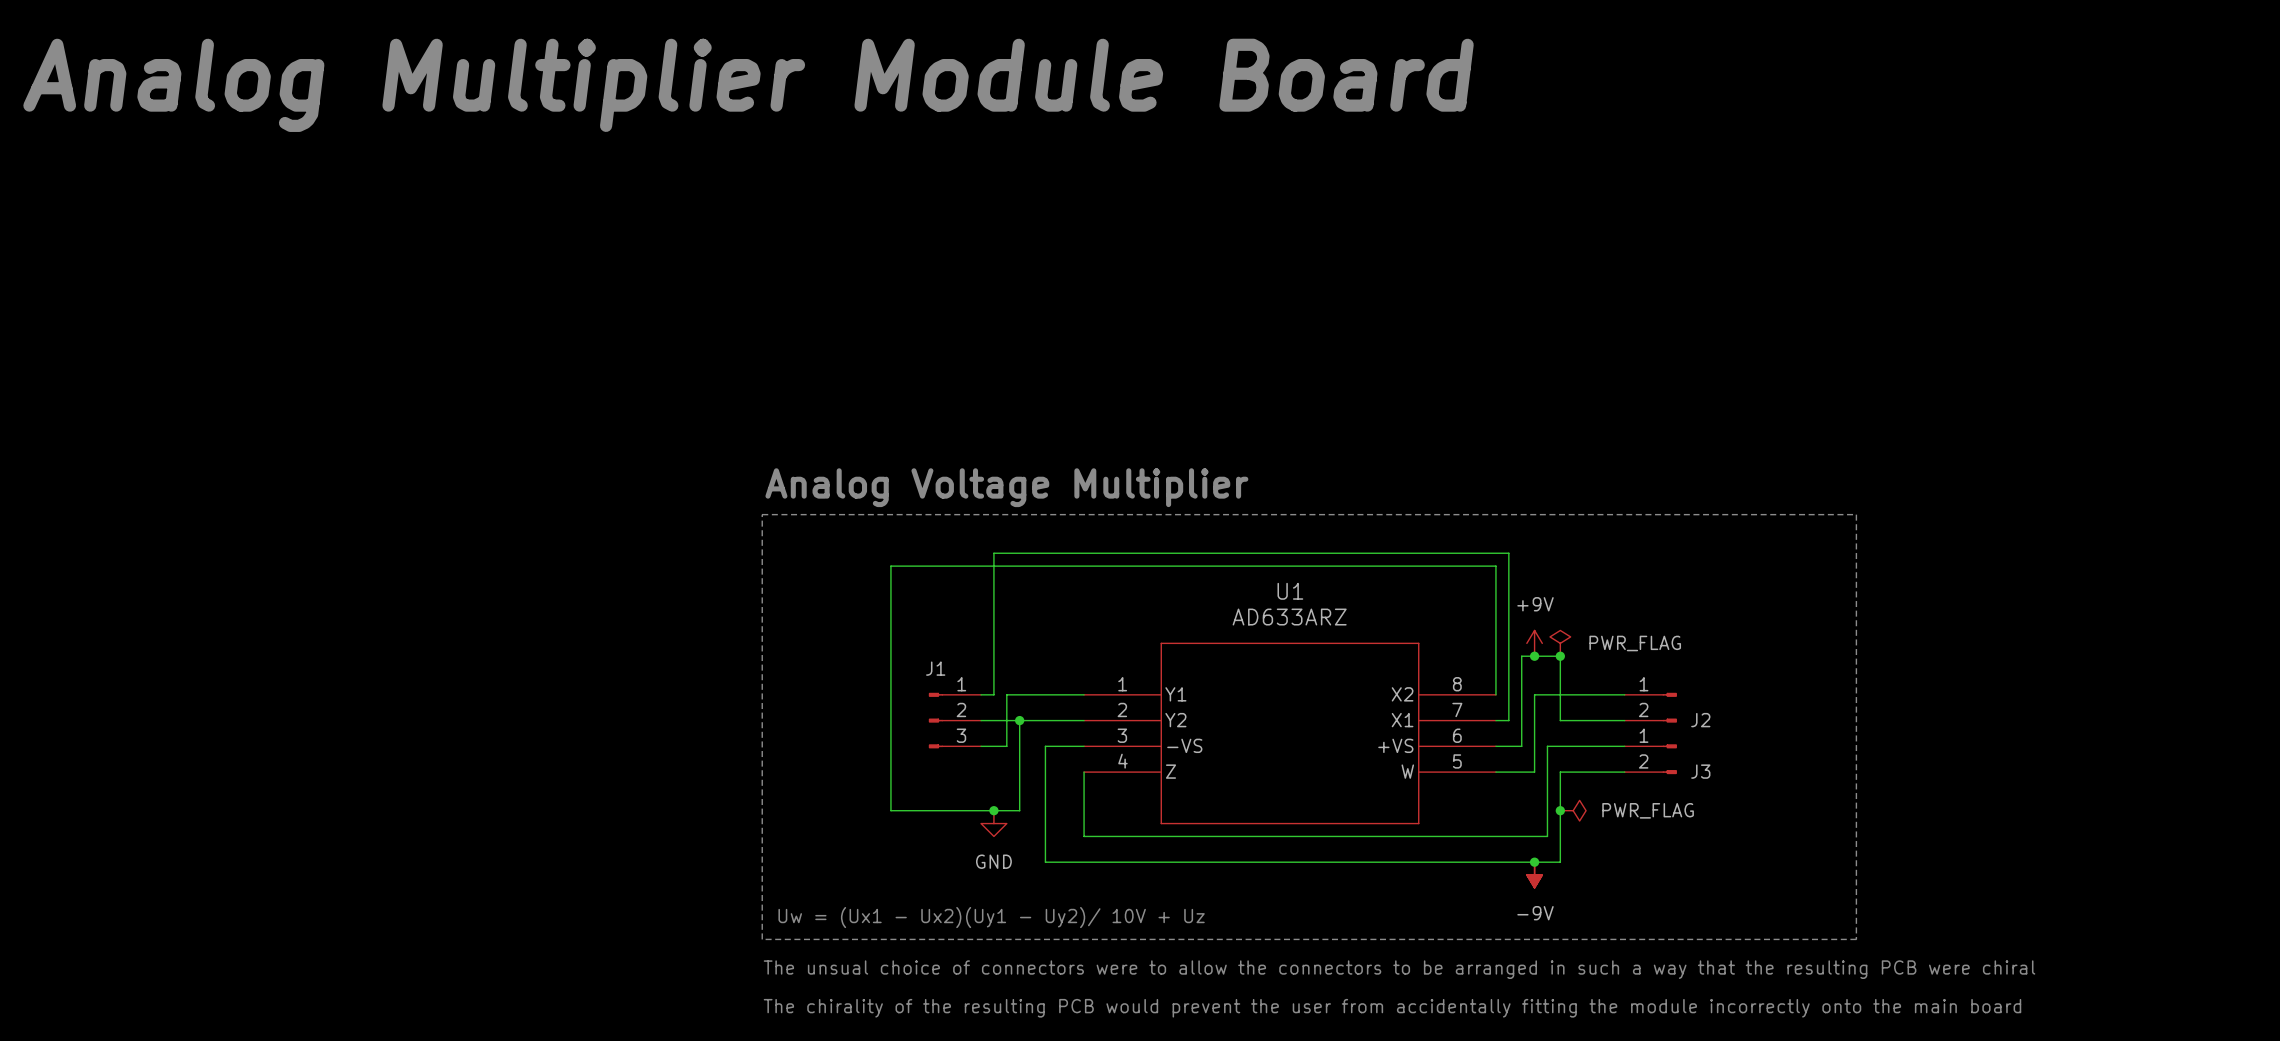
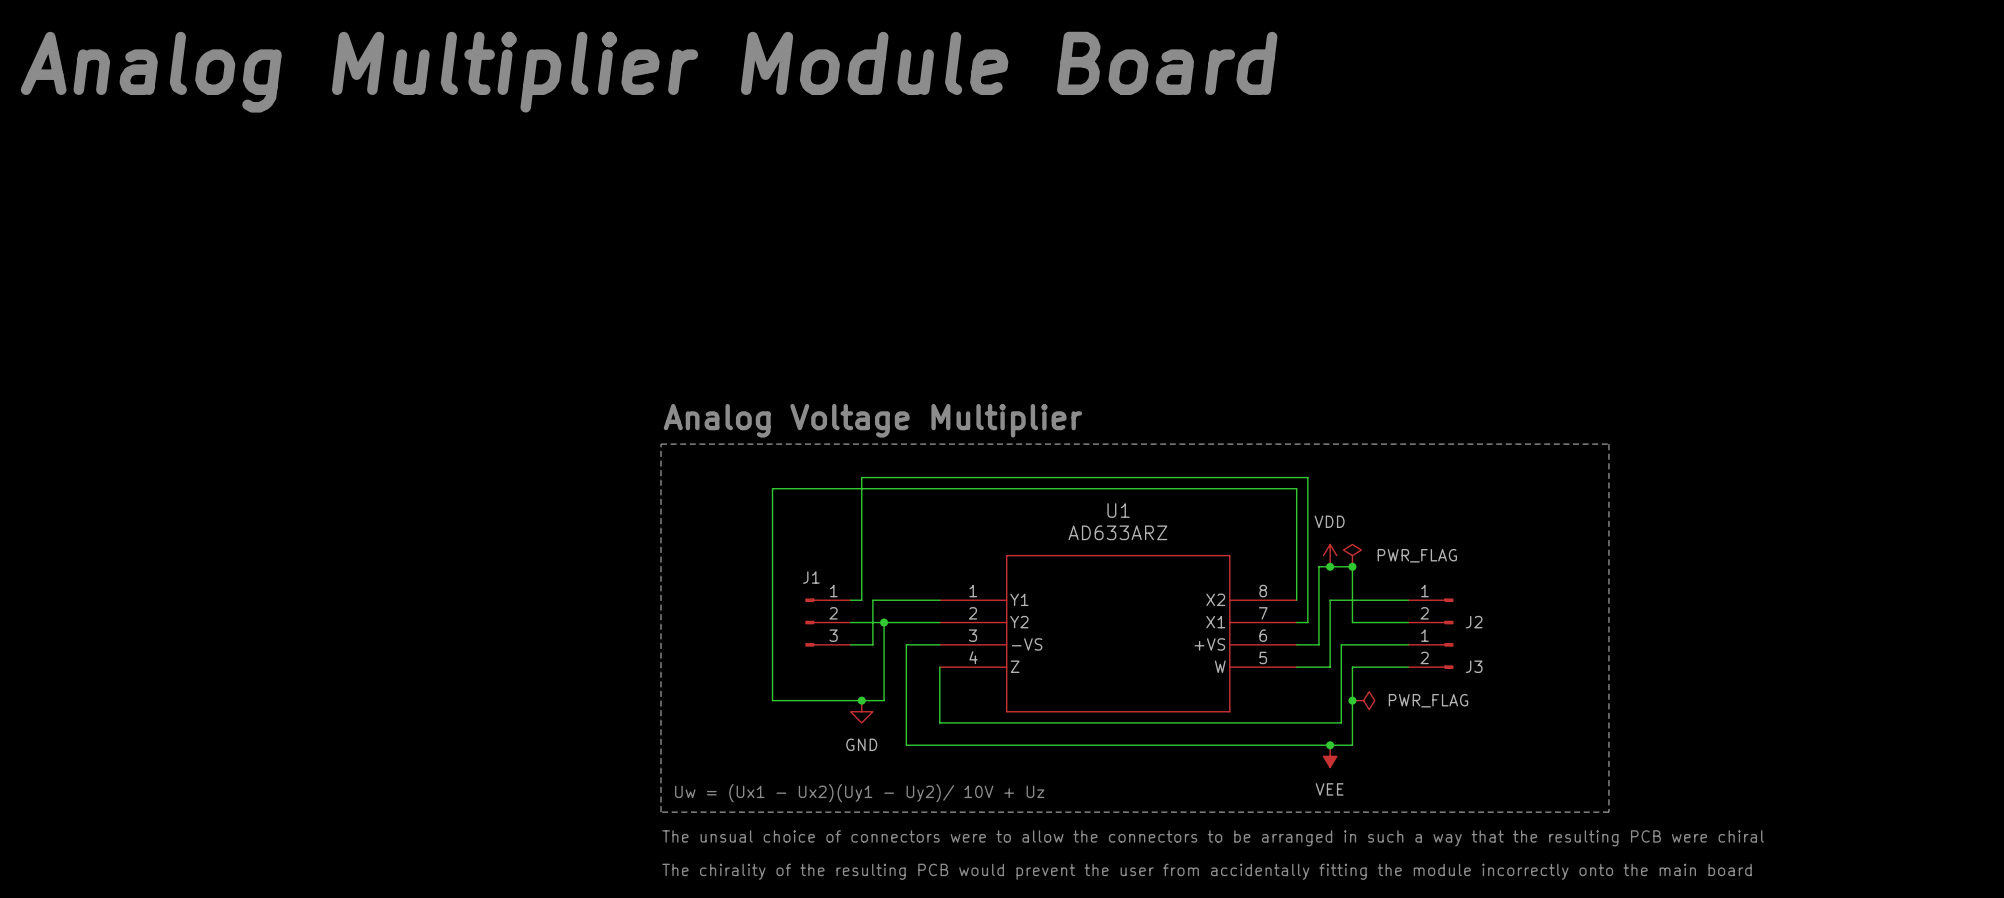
power symbol: +9V (1534, 643) -> VDD (1330, 555)
power symbol: -9V (1534, 875) -> none
power symbol: (1534, 875) -> none
power symbol: none -> VEE (1330, 756)

